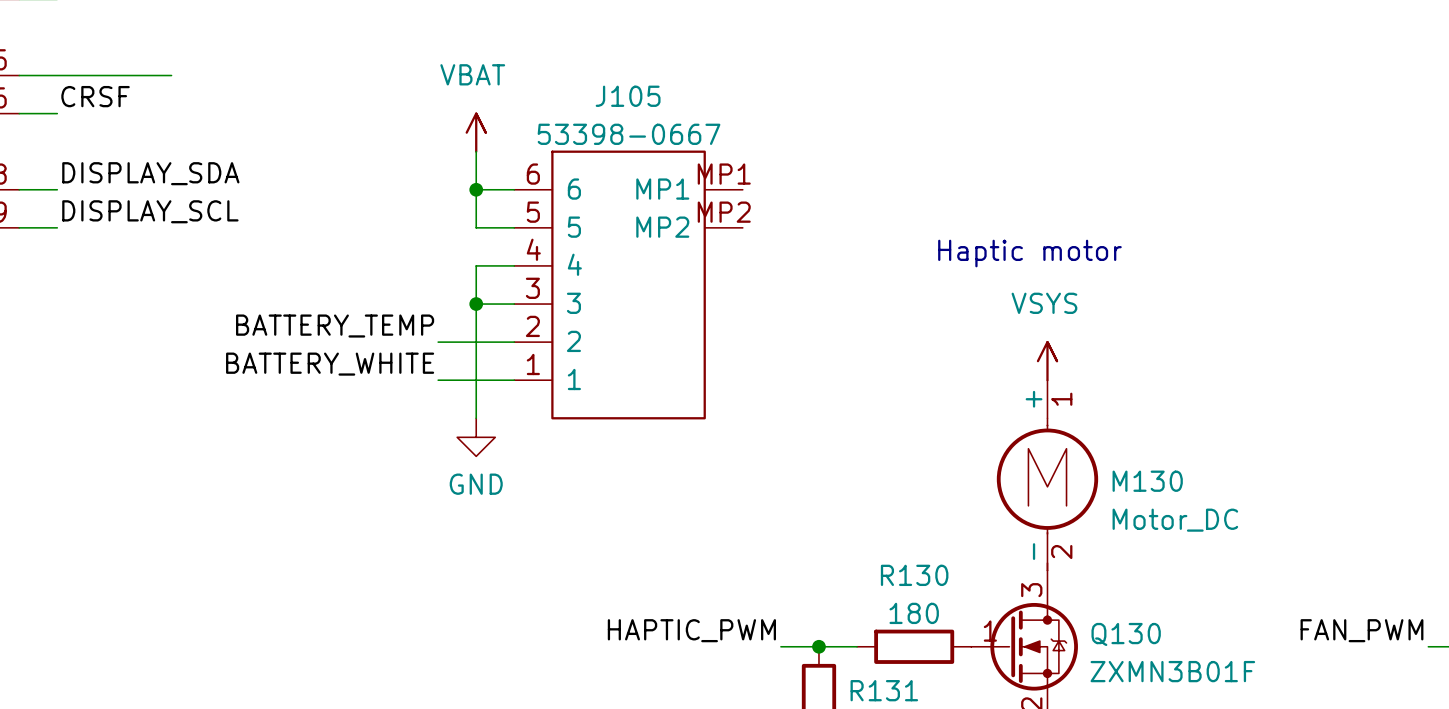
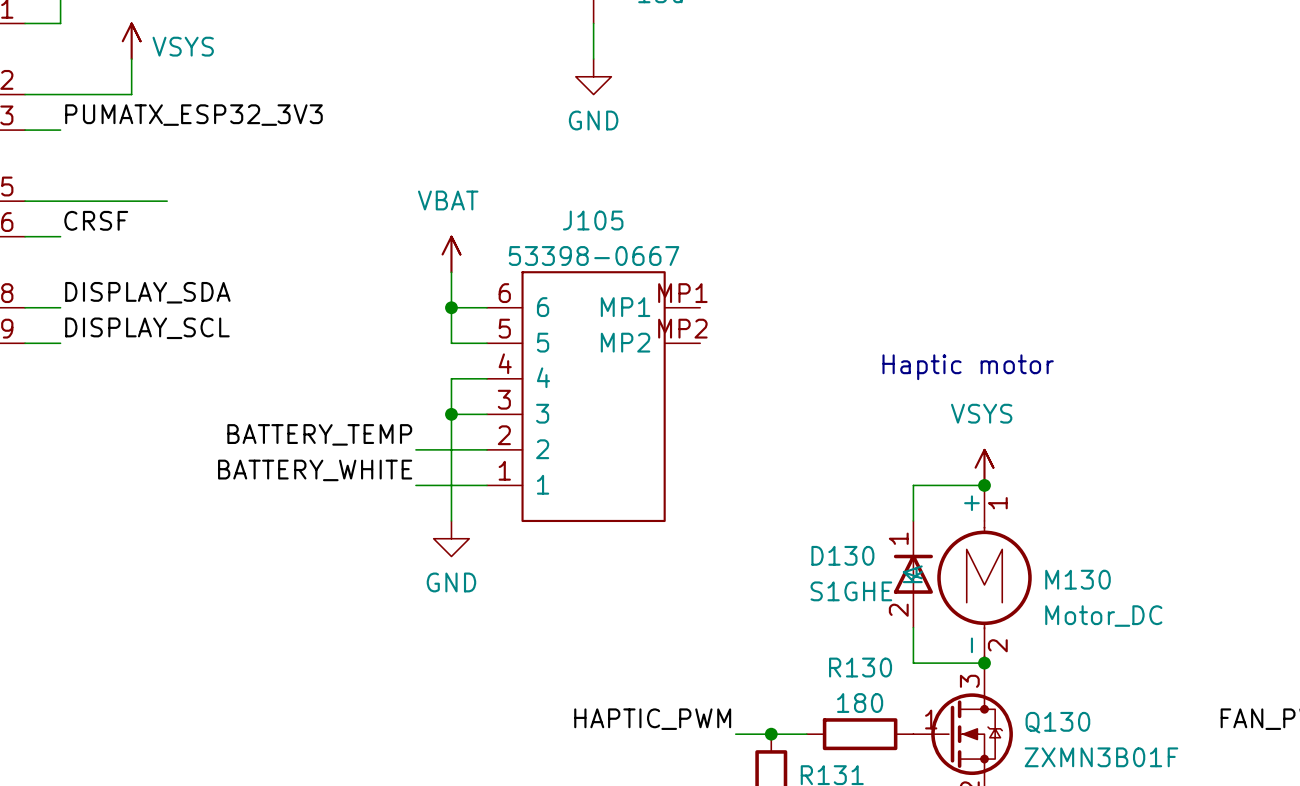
wire: none -> (984, 485) (913, 485) (913, 520)
junction: none -> (984, 485)
D130: none -> S1GHE (913, 574)
wire: none -> (913, 627) (913, 663) (984, 663)
junction: none -> (984, 663)

